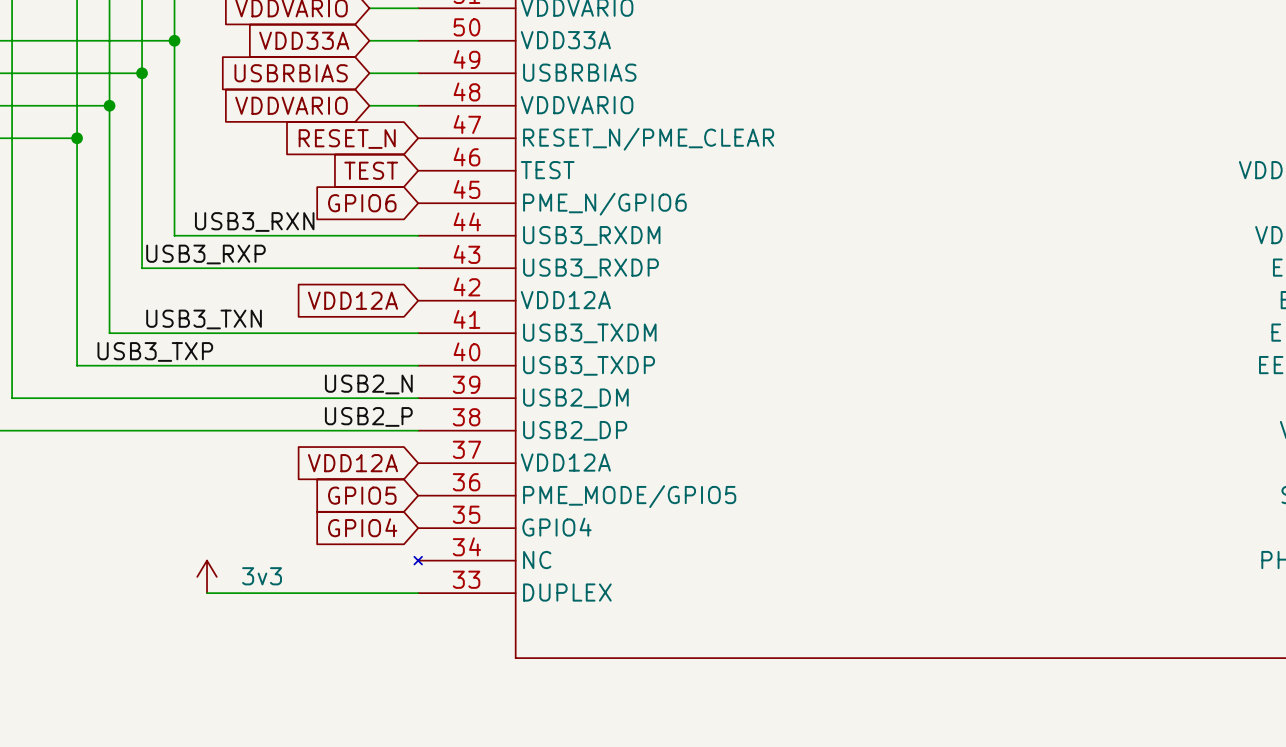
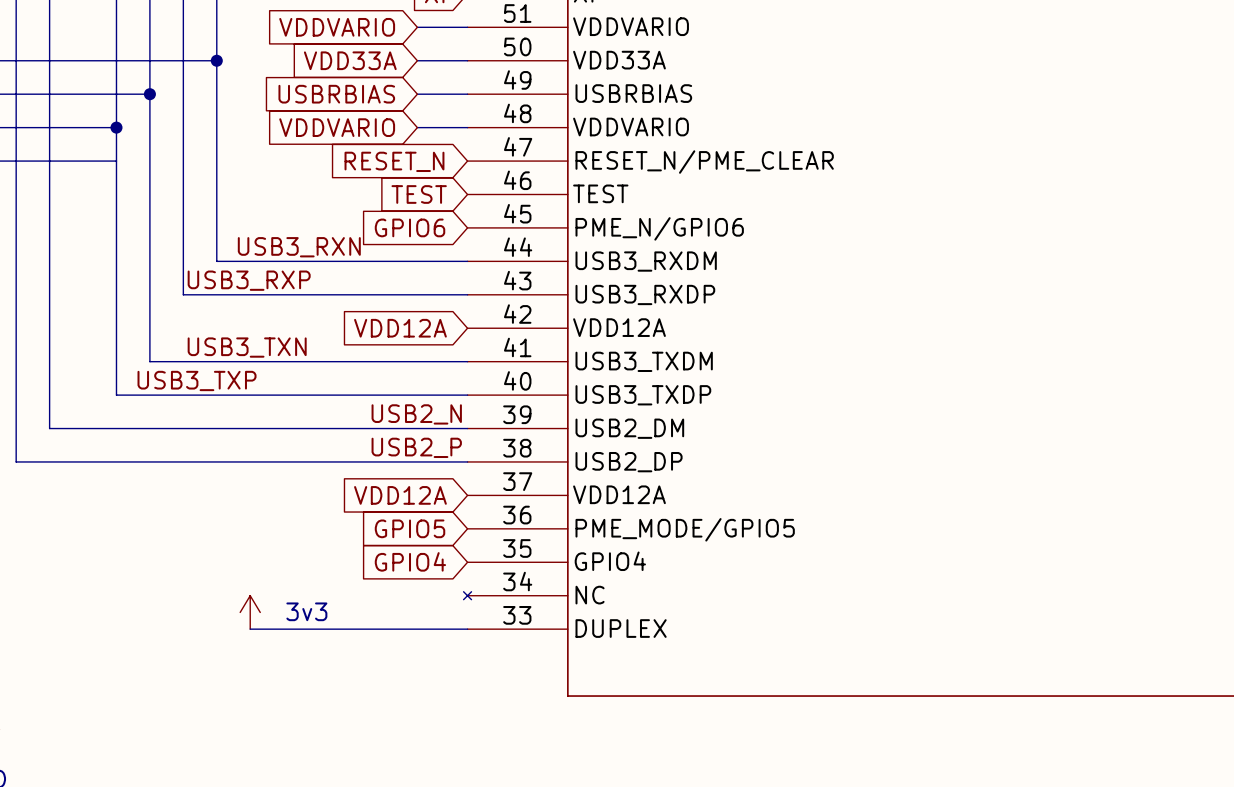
wire: (109, 73) (142, 73) -> none
junction: none -> (149, 94)
junction: (142, 73) -> none
wire: (77, 105) (109, 105) -> none
junction: none -> (116, 127)
junction: (109, 105) -> none
junction: (77, 138) -> none

